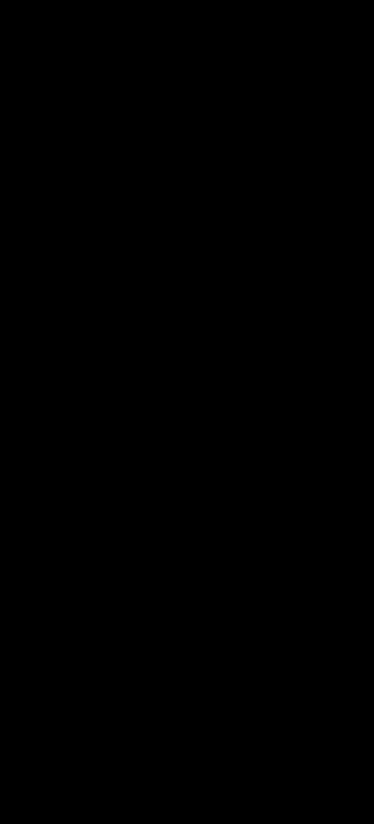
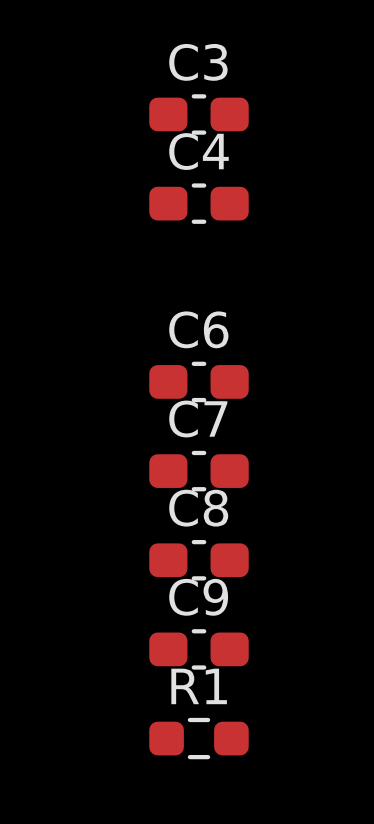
C3: none -> (198, 114)
C4: none -> (198, 203)
C6: none -> (198, 381)
C7: none -> (198, 471)
C8: none -> (198, 560)
C9: none -> (198, 649)
R1: none -> (198, 738)

